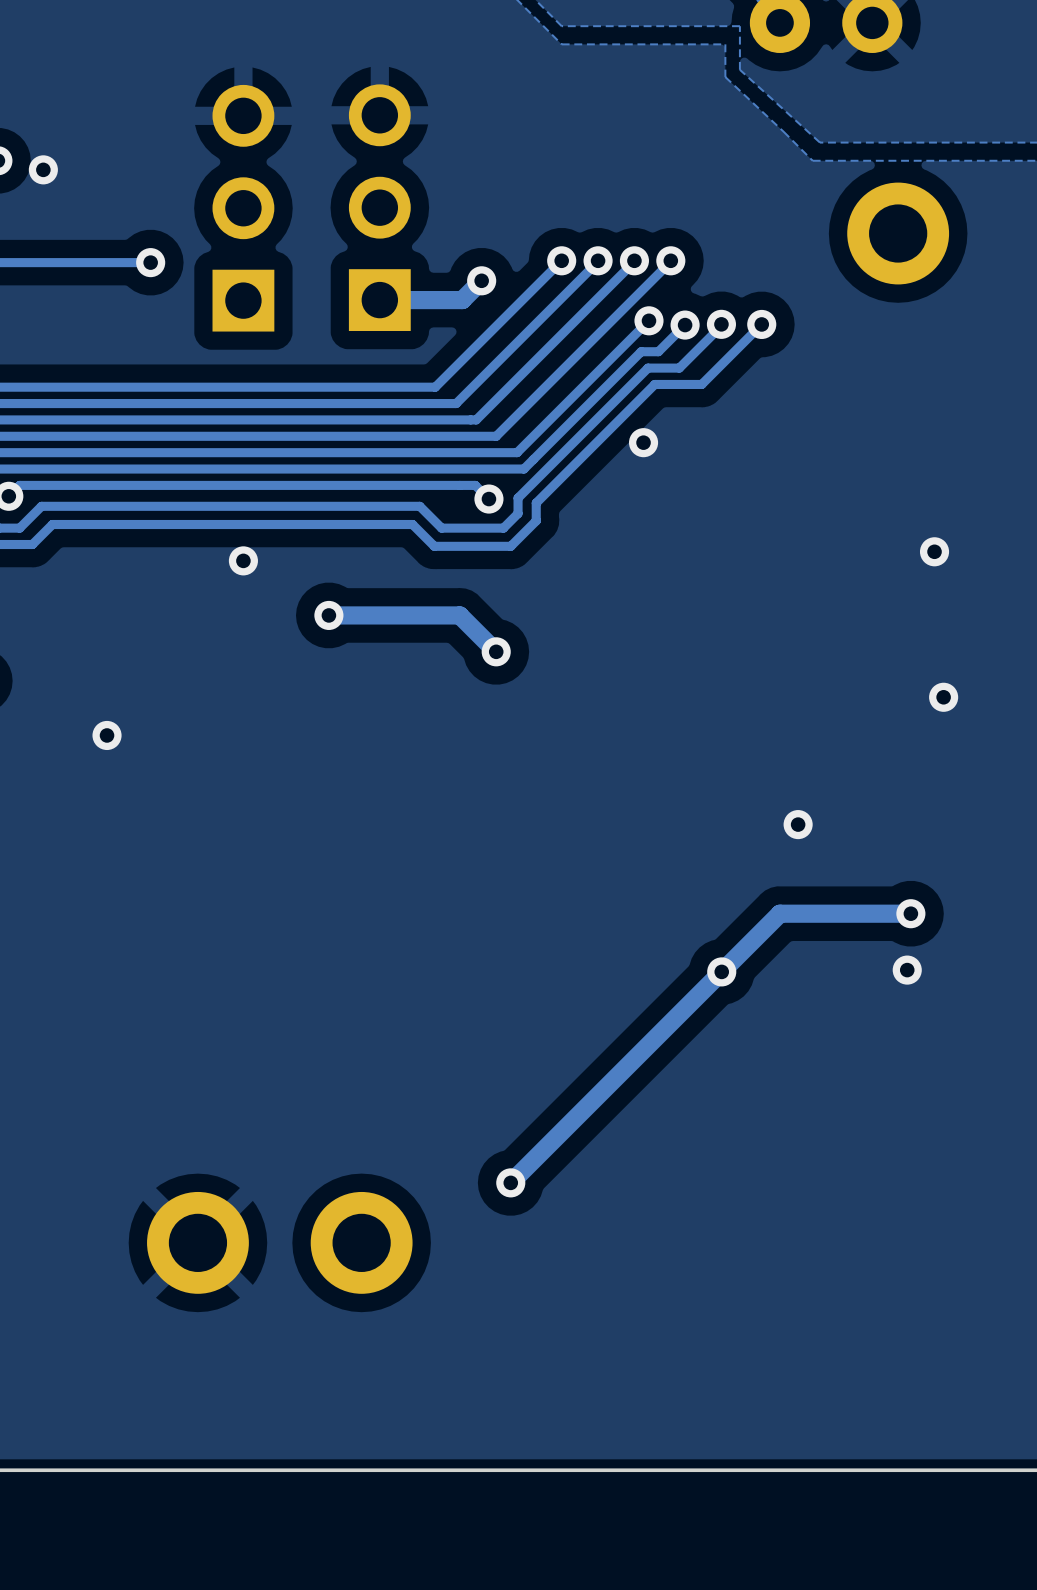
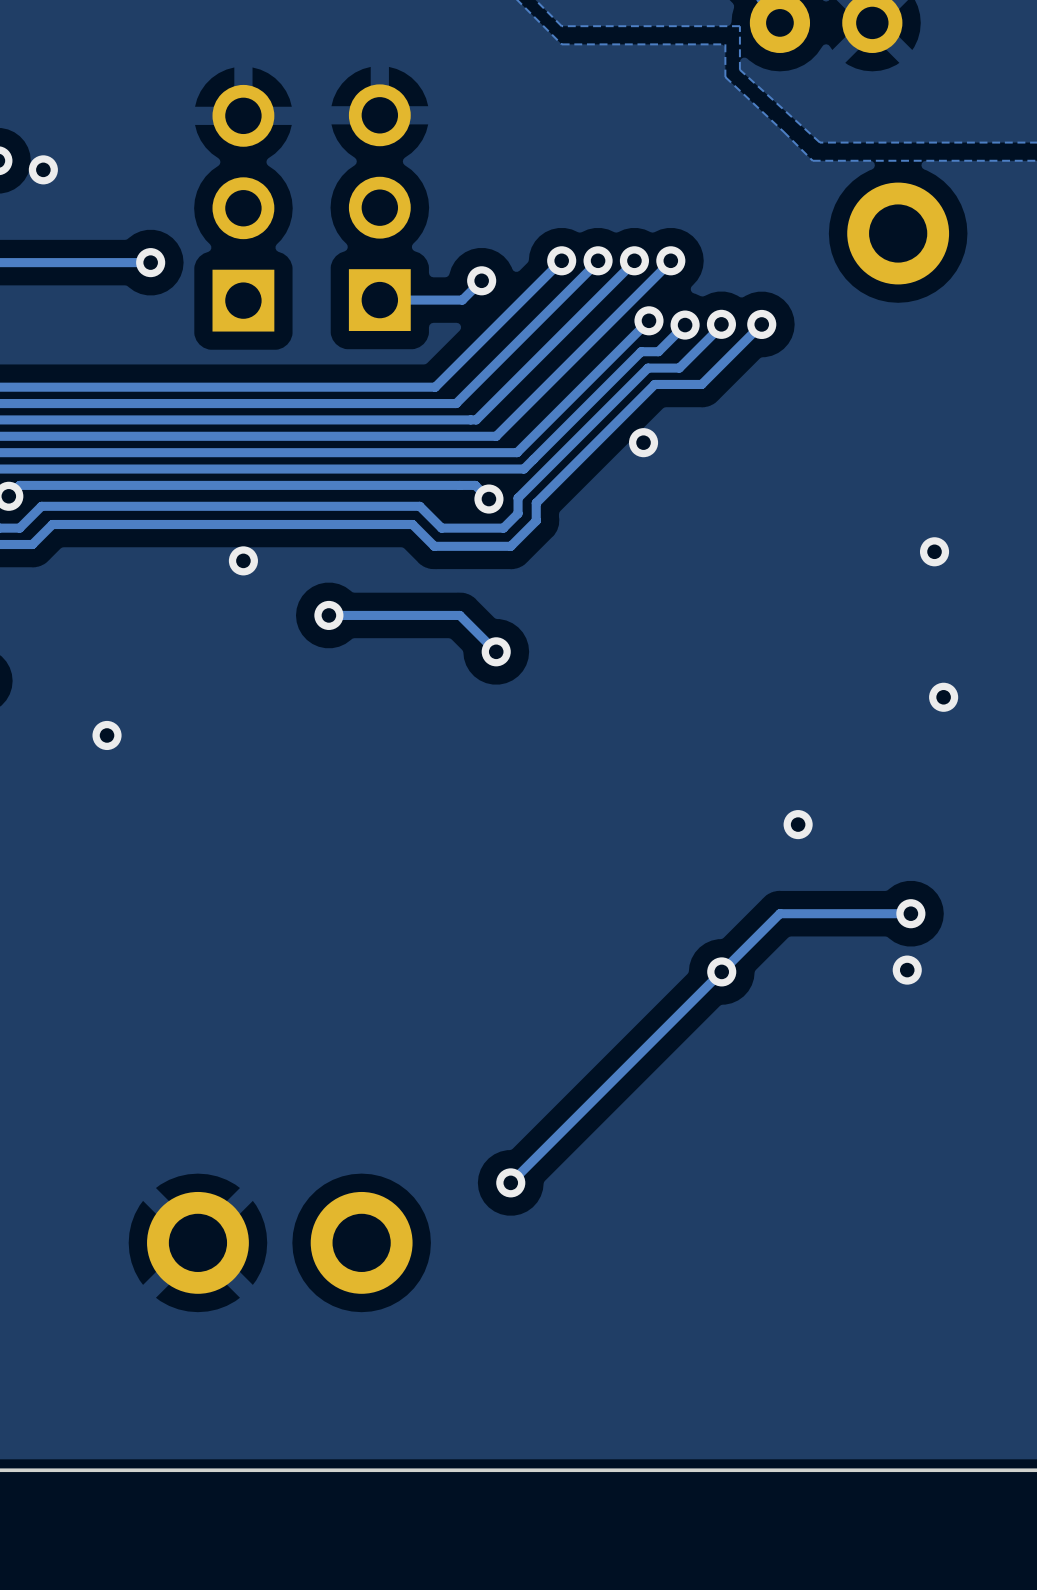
track width: thick (481, 280) (462, 300) (379, 300) -> thin (481, 280) (462, 300) (379, 300)
track width: thick (328, 615) (459, 615) (496, 651) -> thin (328, 615) (459, 615) (496, 651)
track width: thick (910, 913) (779, 913) (510, 1182) -> thin (910, 913) (779, 913) (510, 1182)

